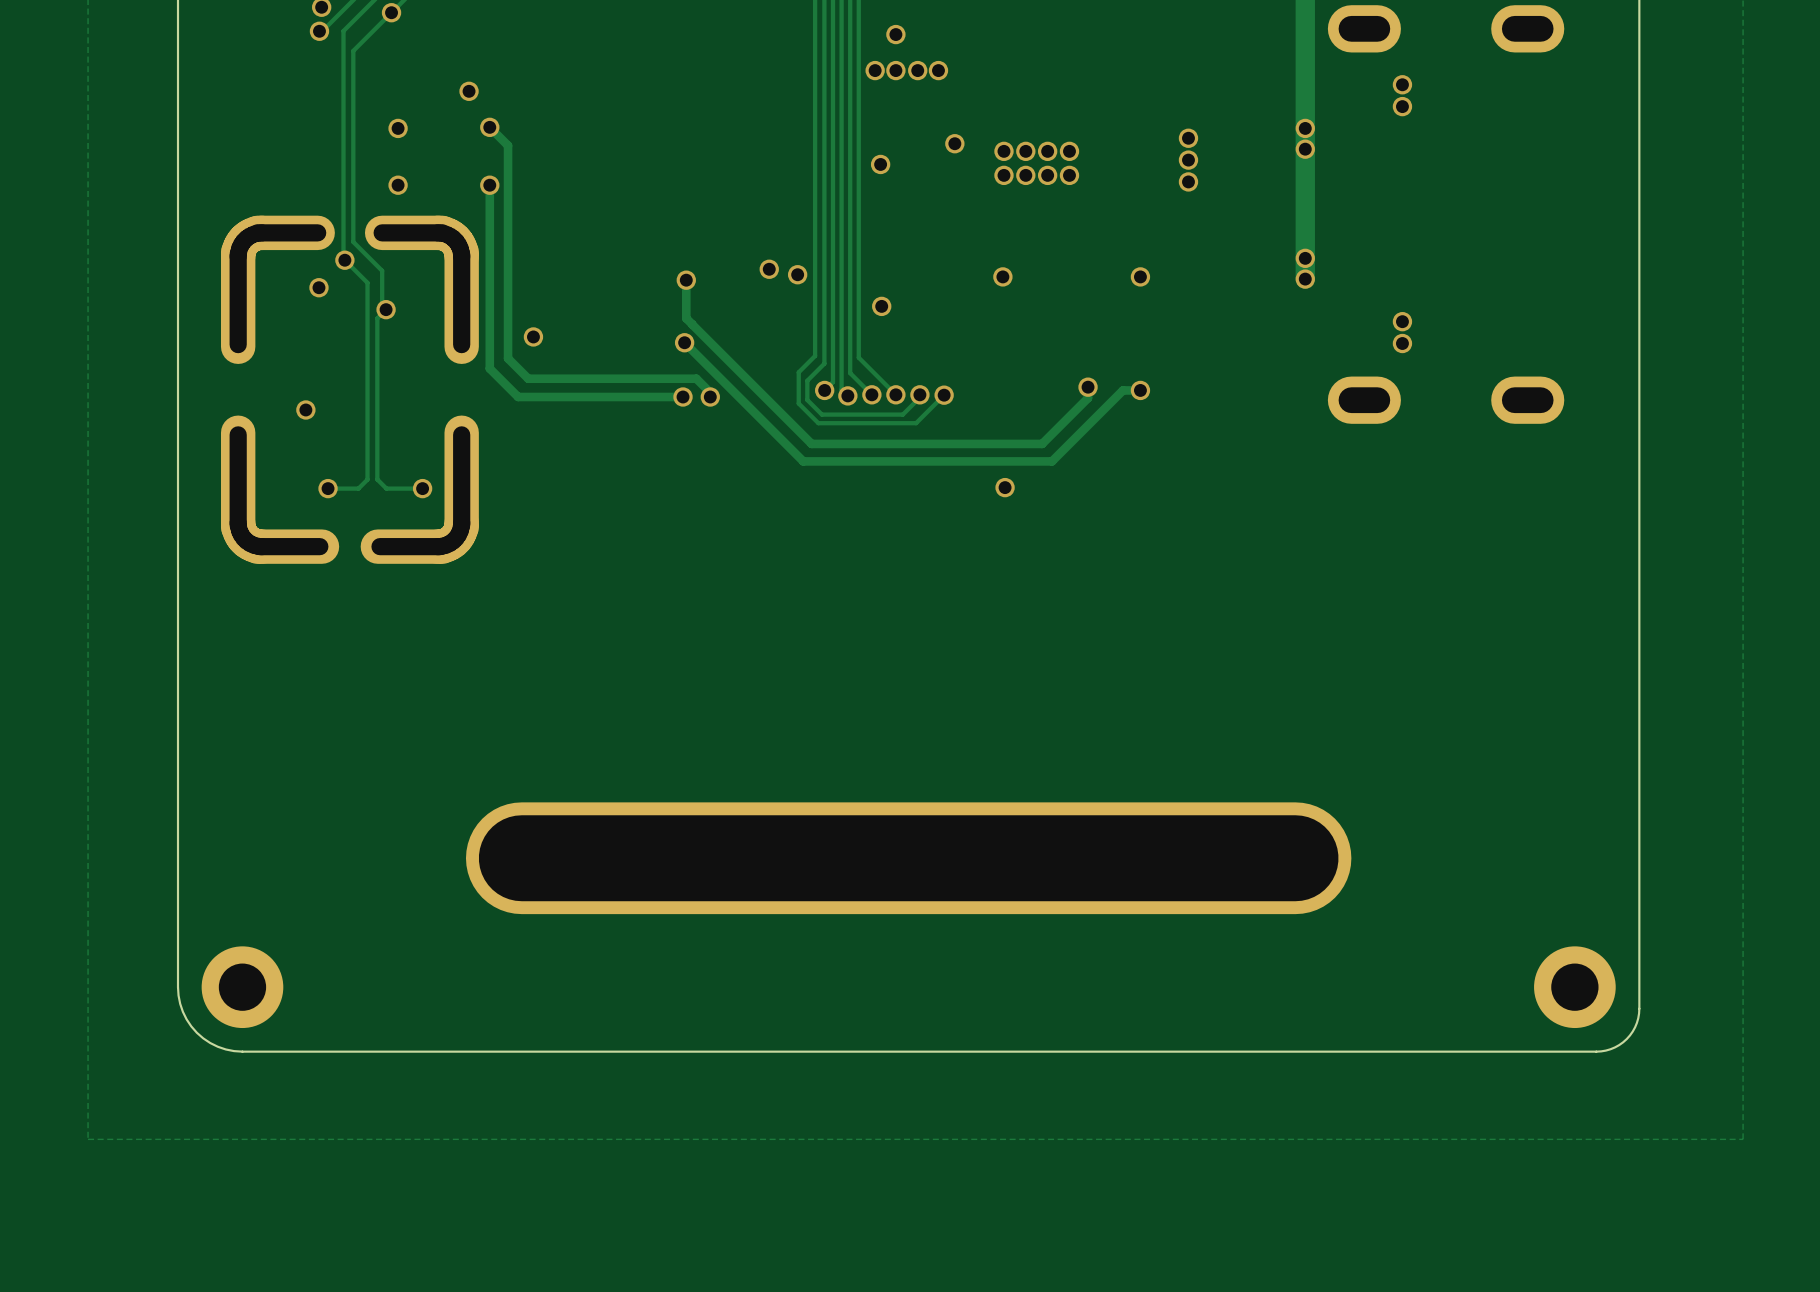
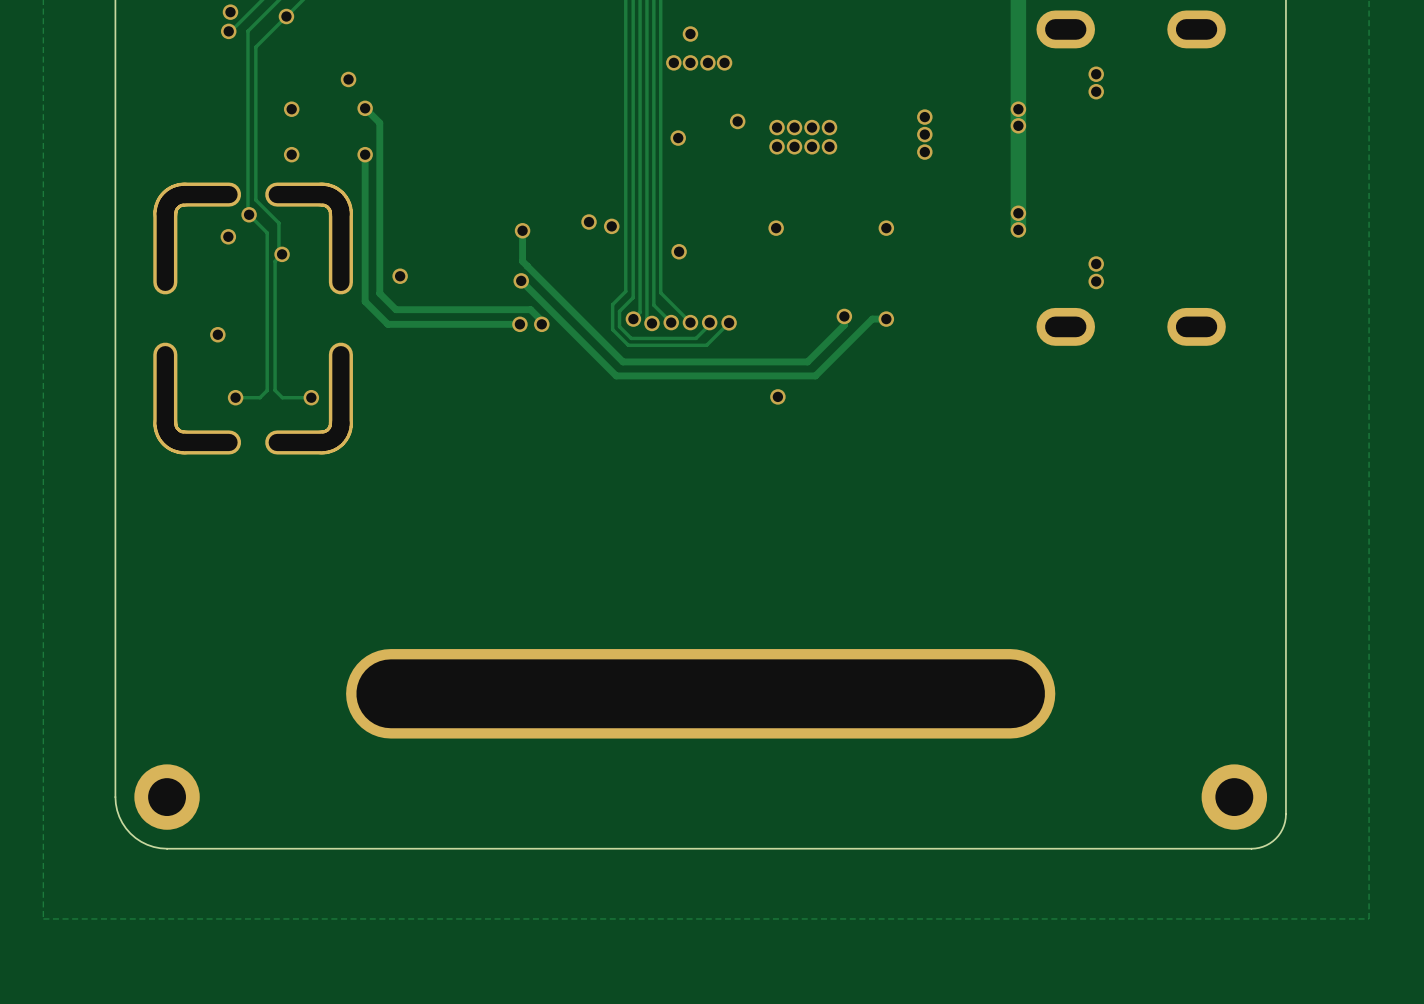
part footprint: [220, 215, 479, 564] -> [153, 182, 353, 455]

